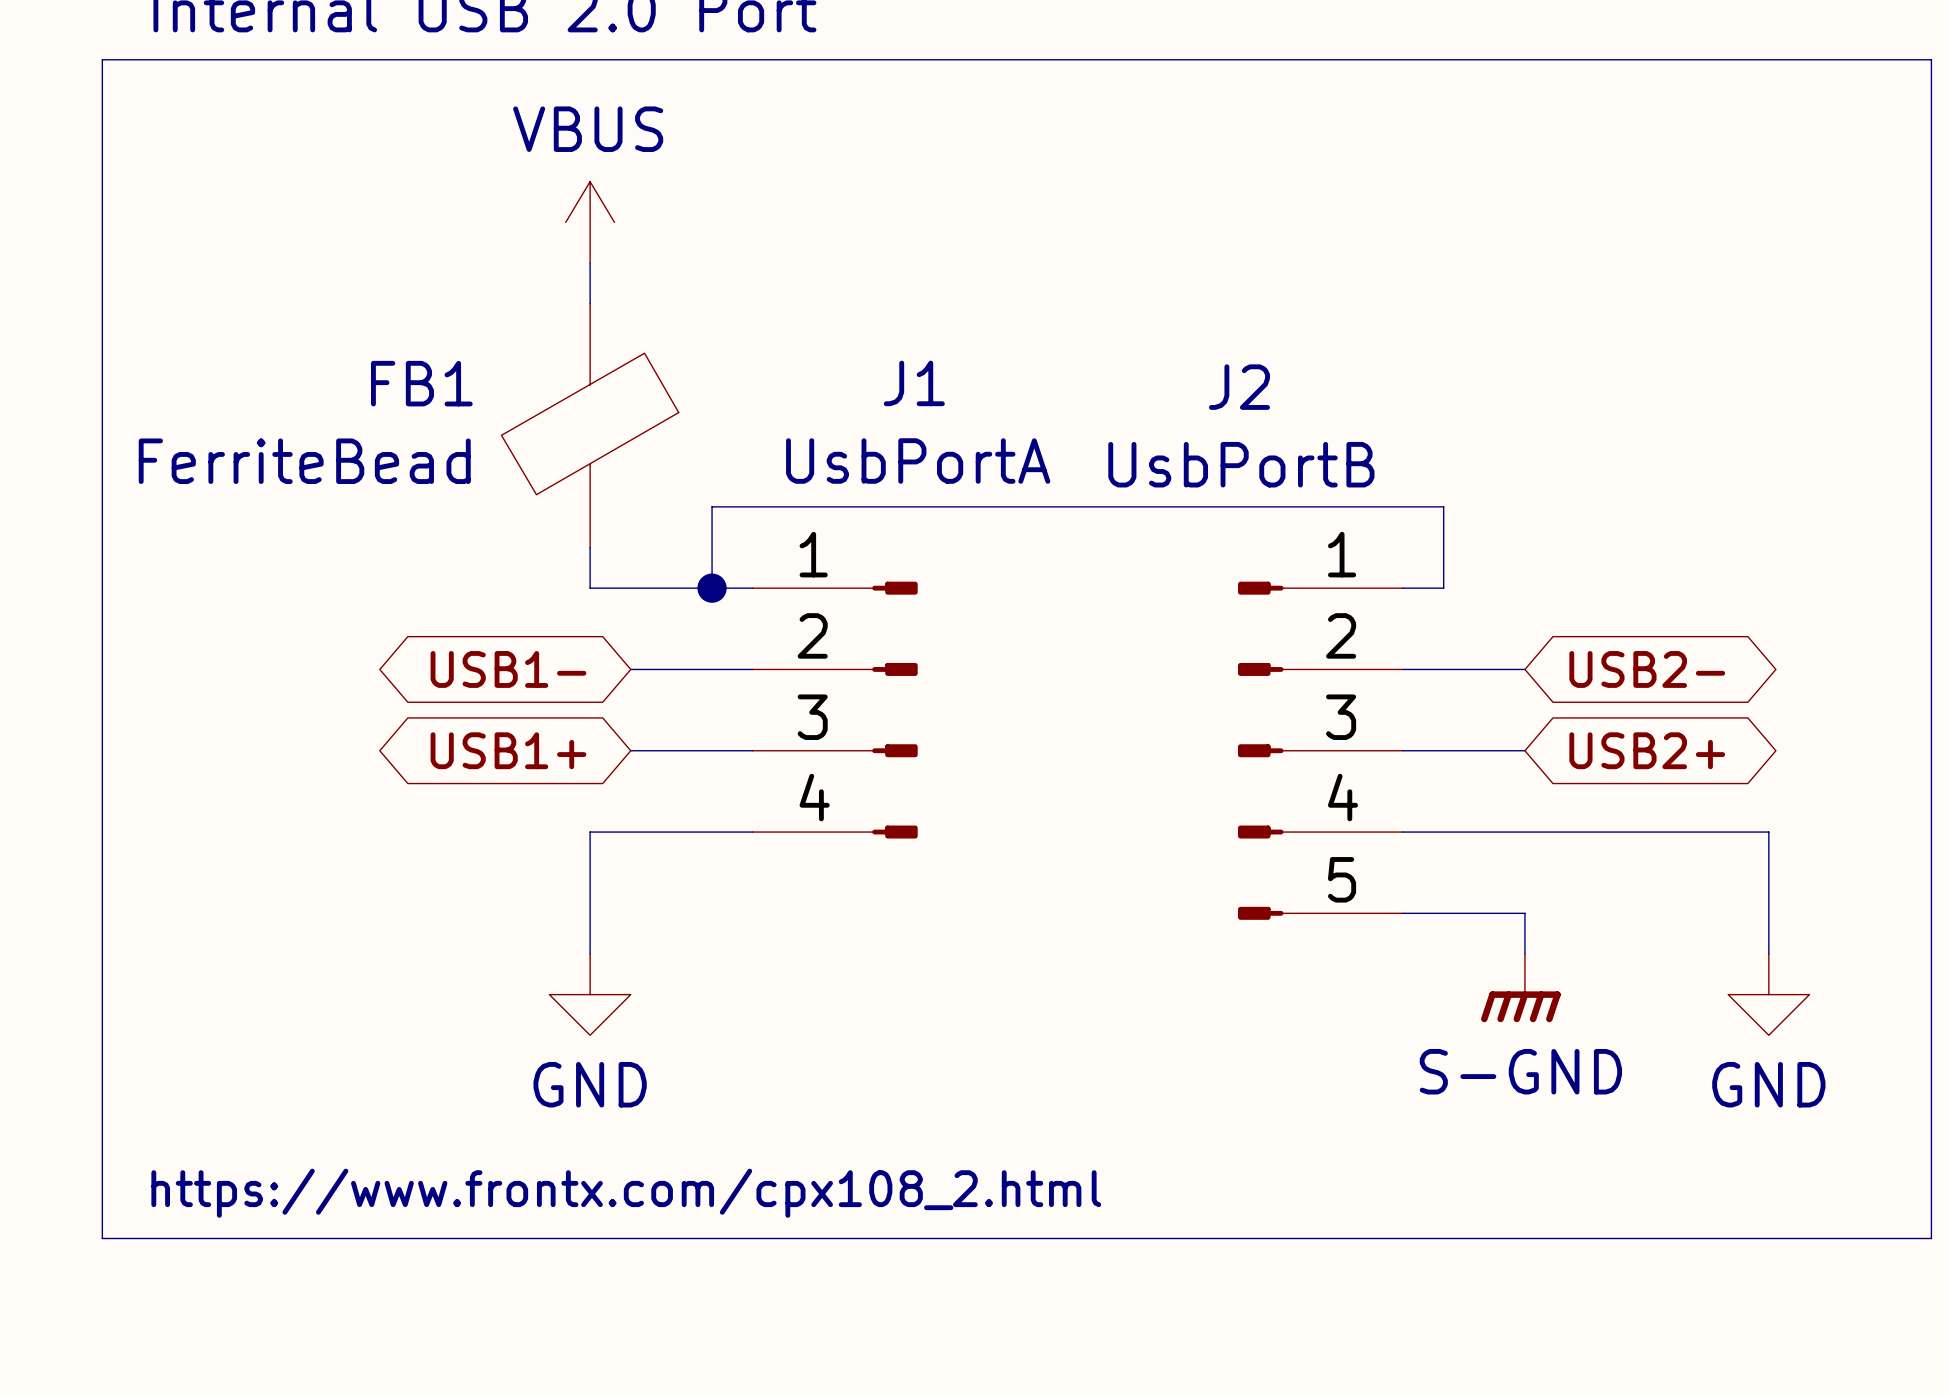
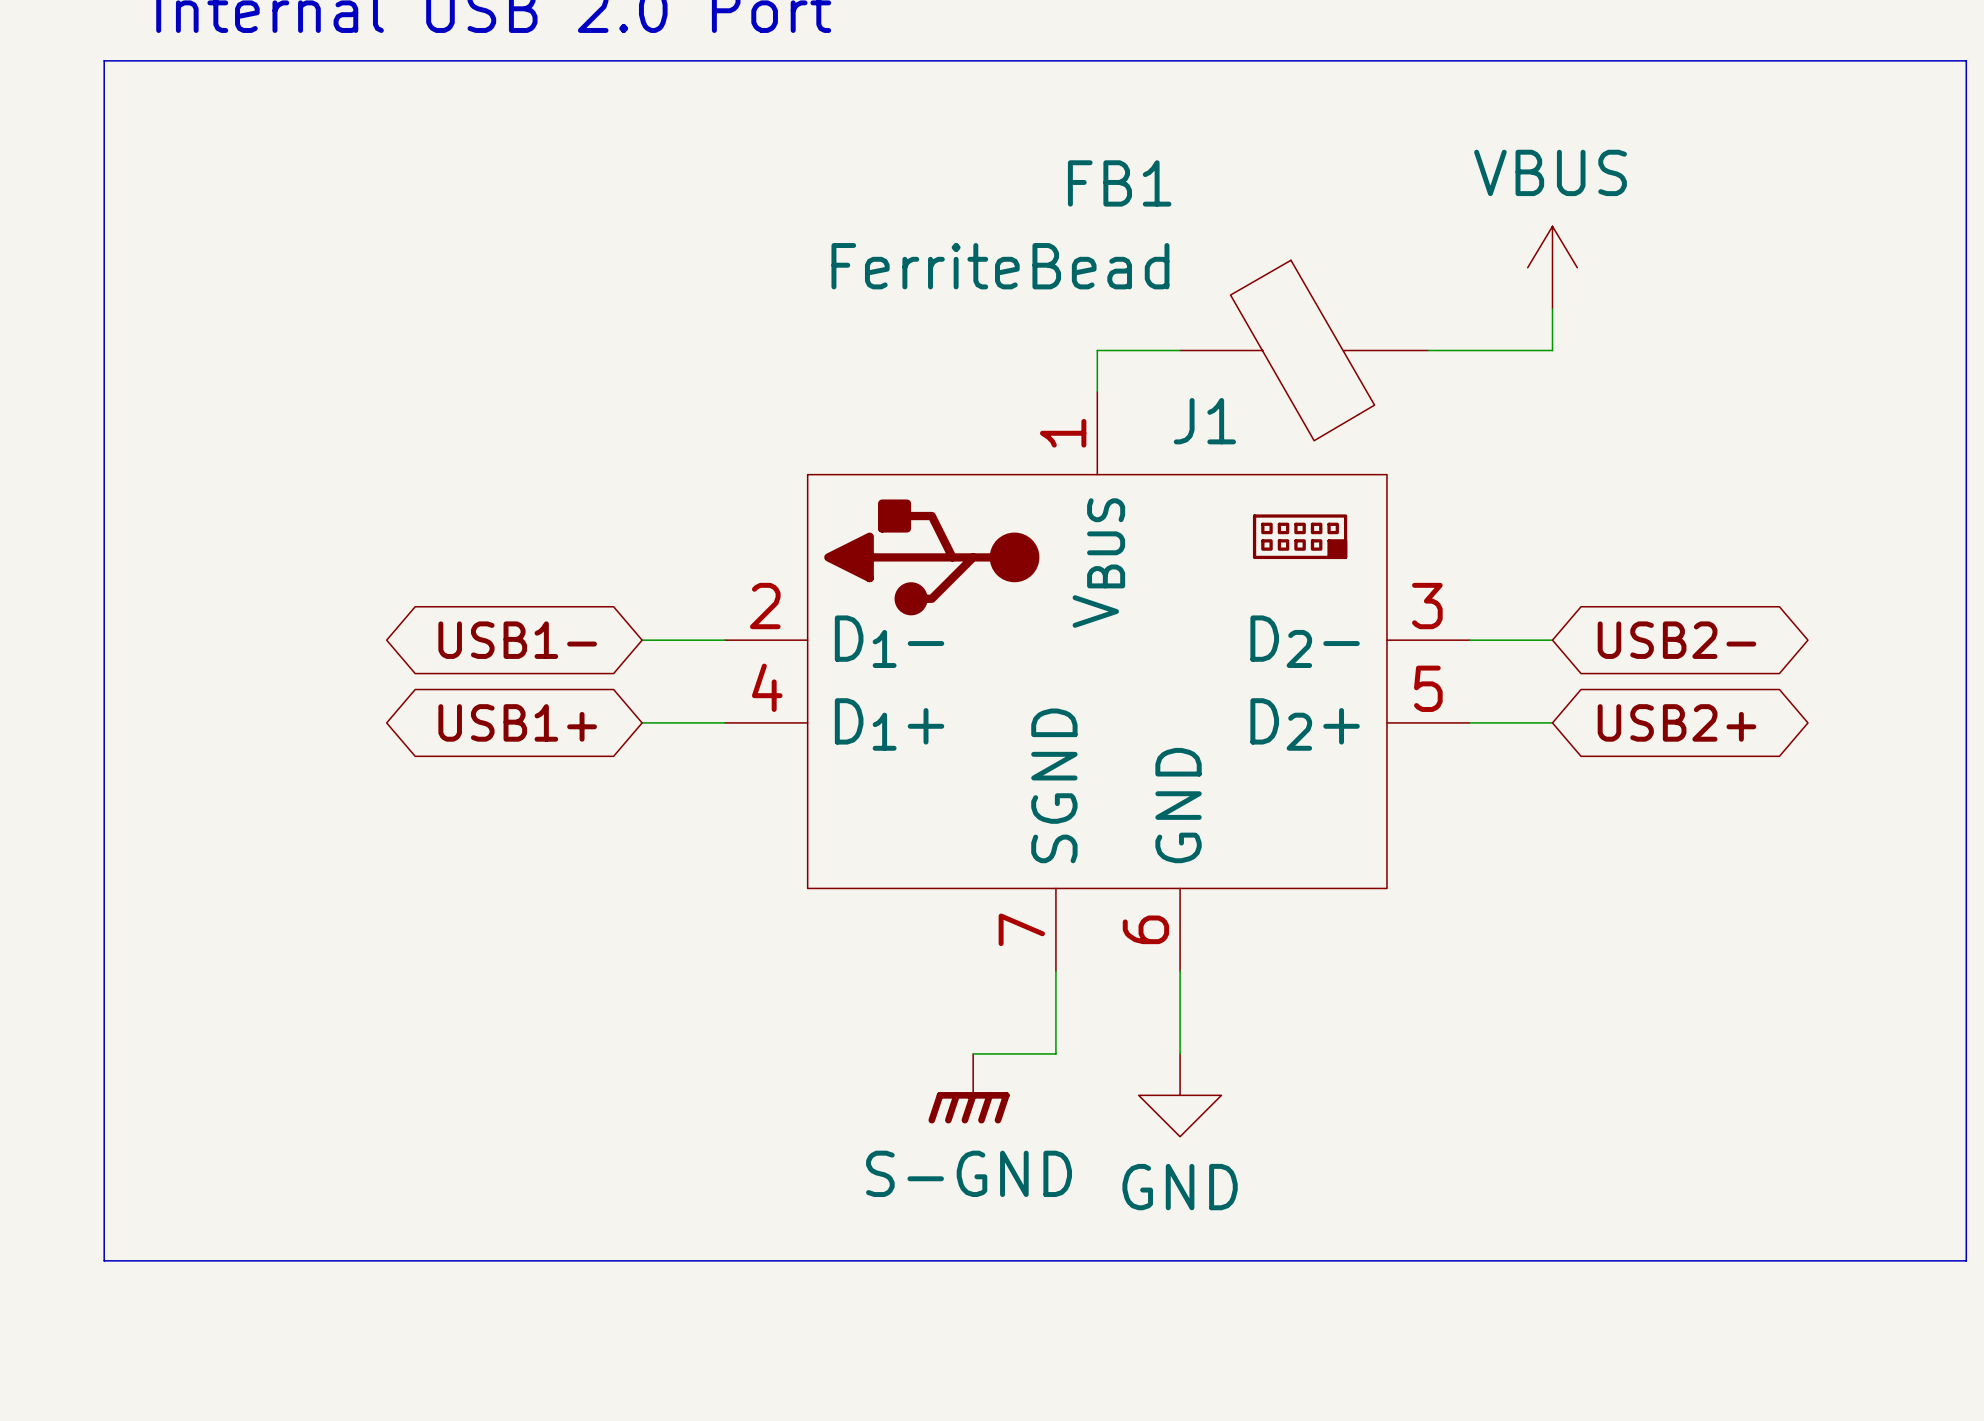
power symbol: VBUS (590, 222) -> none
wire: (590, 262) (590, 303) -> none
power symbol: none -> VBUS (1552, 267)
wire: none -> (1552, 309) (1552, 350) (1428, 350)
wire: none -> (1180, 350) (1097, 350) (1097, 391)
FB1 name position: FB1 (421, 383) -> FB1 (1119, 183)
J1 name position: J1 (914, 383) -> J1 (1204, 421)
FB1 rotation: 0° (590, 423) -> 90° counterclockwise (1302, 350)
FB1 position: (590, 425) -> (1304, 350)
FB1 value position: FerriteBead (304, 461) -> FerriteBead (1000, 266)
J1 value: UsbPortA (918, 461) -> none
wire: (590, 547) (590, 588) (752, 588) -> none
J1 symbol: [752, 581, 918, 839] -> [724, 391, 1470, 972]
wire: (712, 588) (712, 506) (1443, 506) (1443, 588) (1403, 588) -> none
junction: (712, 588) -> none
wire: none -> (642, 640) (724, 640)
wire: none -> (1469, 640) (1552, 640)
global label position: USB1- (508, 669) -> USB1- (517, 640)
wire: (630, 669) (752, 669) -> none
wire: (1403, 669) (1524, 669) -> none
global label position: USB2- (1647, 669) -> USB2- (1676, 640)
wire: none -> (642, 722) (724, 722)
wire: none -> (1469, 722) (1552, 722)
global label position: USB1+ (508, 750) -> USB1+ (517, 722)
wire: (630, 750) (752, 750) -> none
J2: UsbPortB (1320, 750) -> none
wire: (1403, 750) (1524, 750) -> none
global label position: USB2+ (1647, 750) -> USB2+ (1676, 722)
wire: (752, 832) (590, 832) (590, 953) -> none
wire: (1403, 832) (1768, 832) (1768, 953) -> none
wire: (1403, 913) (1524, 913) (1524, 953) -> none
wire: none -> (1055, 971) (1055, 1053) (973, 1053)
wire: none -> (1180, 971) (1180, 1053)
power symbol position: S-GND (1520, 988) -> S-GND (969, 1088)
power symbol: GND (590, 994) -> none
power symbol: GND (1768, 994) -> none
power symbol: none -> GND (1180, 1095)
text: https://www.frontx.com/cpx108_2.html (626, 1193) -> none

